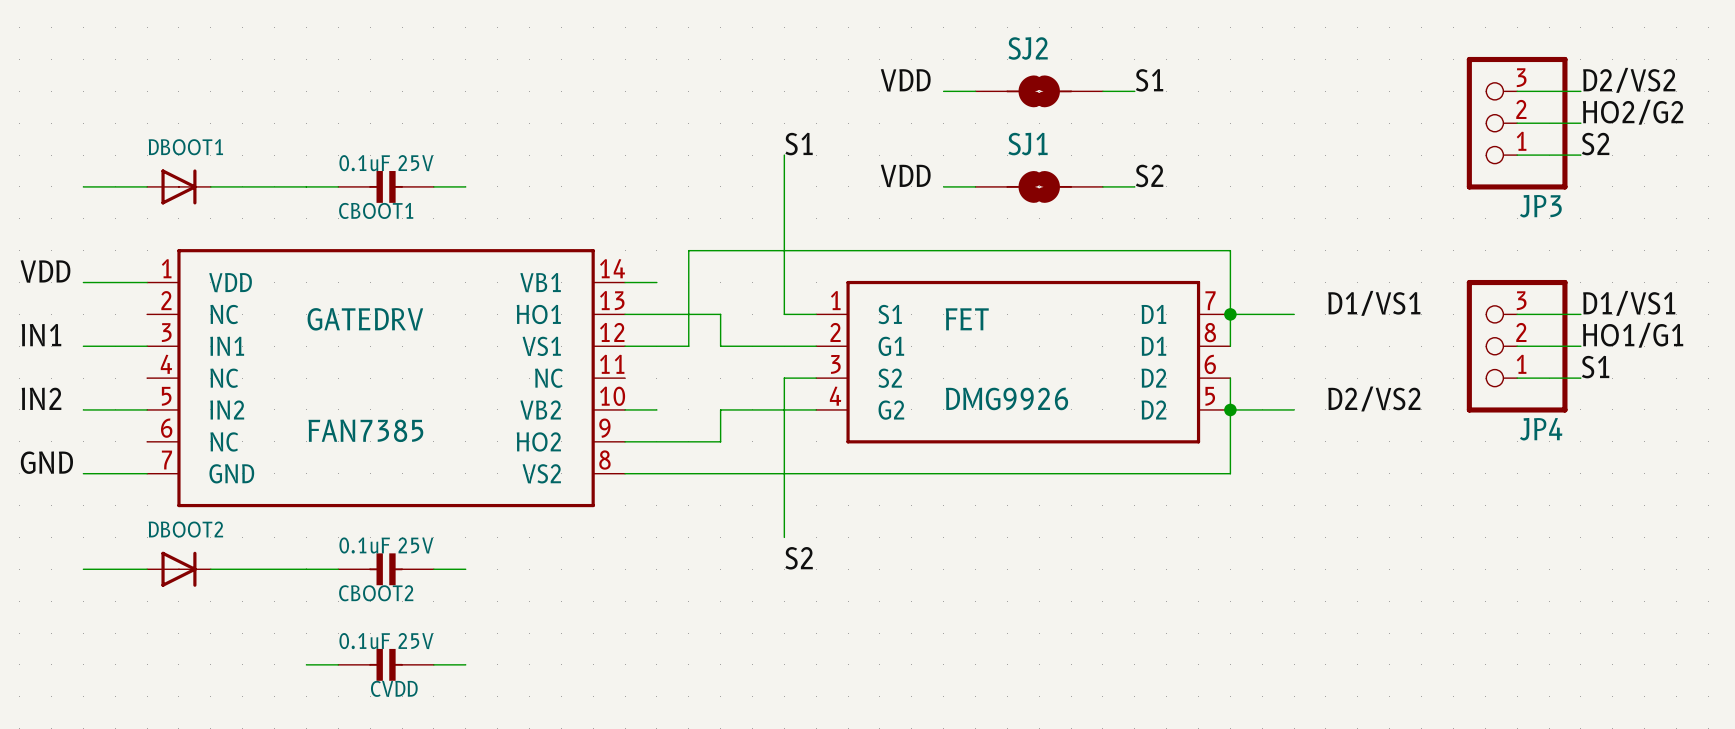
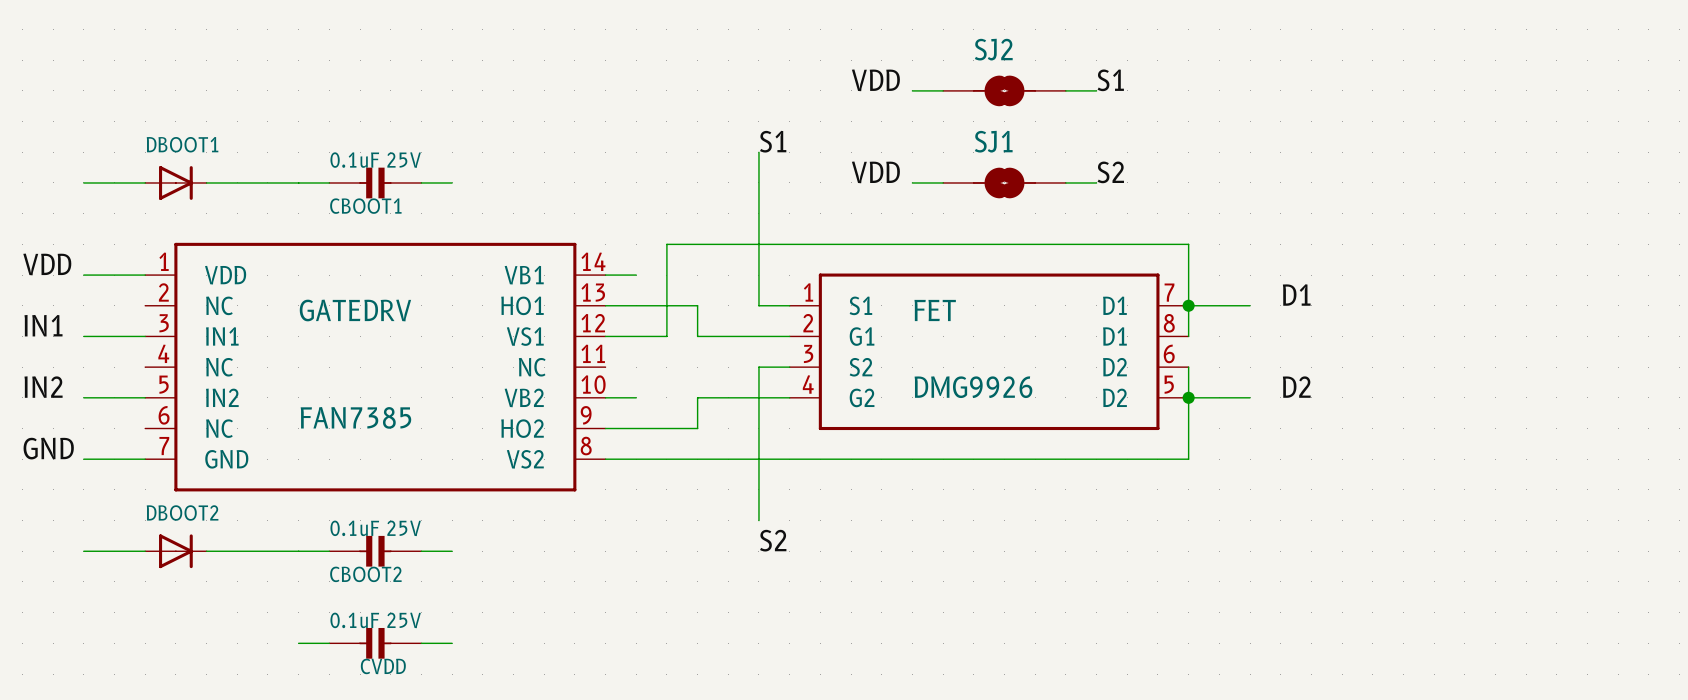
label: D2/VS2 (1629, 80) -> none
wire: (1517, 91) (1580, 91) -> none
label: HO2/G2 (1633, 112) -> none
wire: (1517, 123) (1580, 123) -> none
JP3: (1517, 123) -> none
label: S2 (1595, 144) -> none
wire: (1517, 155) (1580, 155) -> none
label: D1/VS1 (1374, 303) -> D1 (1296, 295)
label: D1/VS1 (1629, 303) -> none
wire: (1517, 314) (1580, 314) -> none
label: HO1/G1 (1633, 335) -> none
wire: (1517, 346) (1580, 346) -> none
JP4: (1517, 346) -> none
label: S1 (1595, 367) -> none
wire: (1517, 378) (1580, 378) -> none
label: D2/VS2 (1374, 398) -> D2 (1296, 387)

